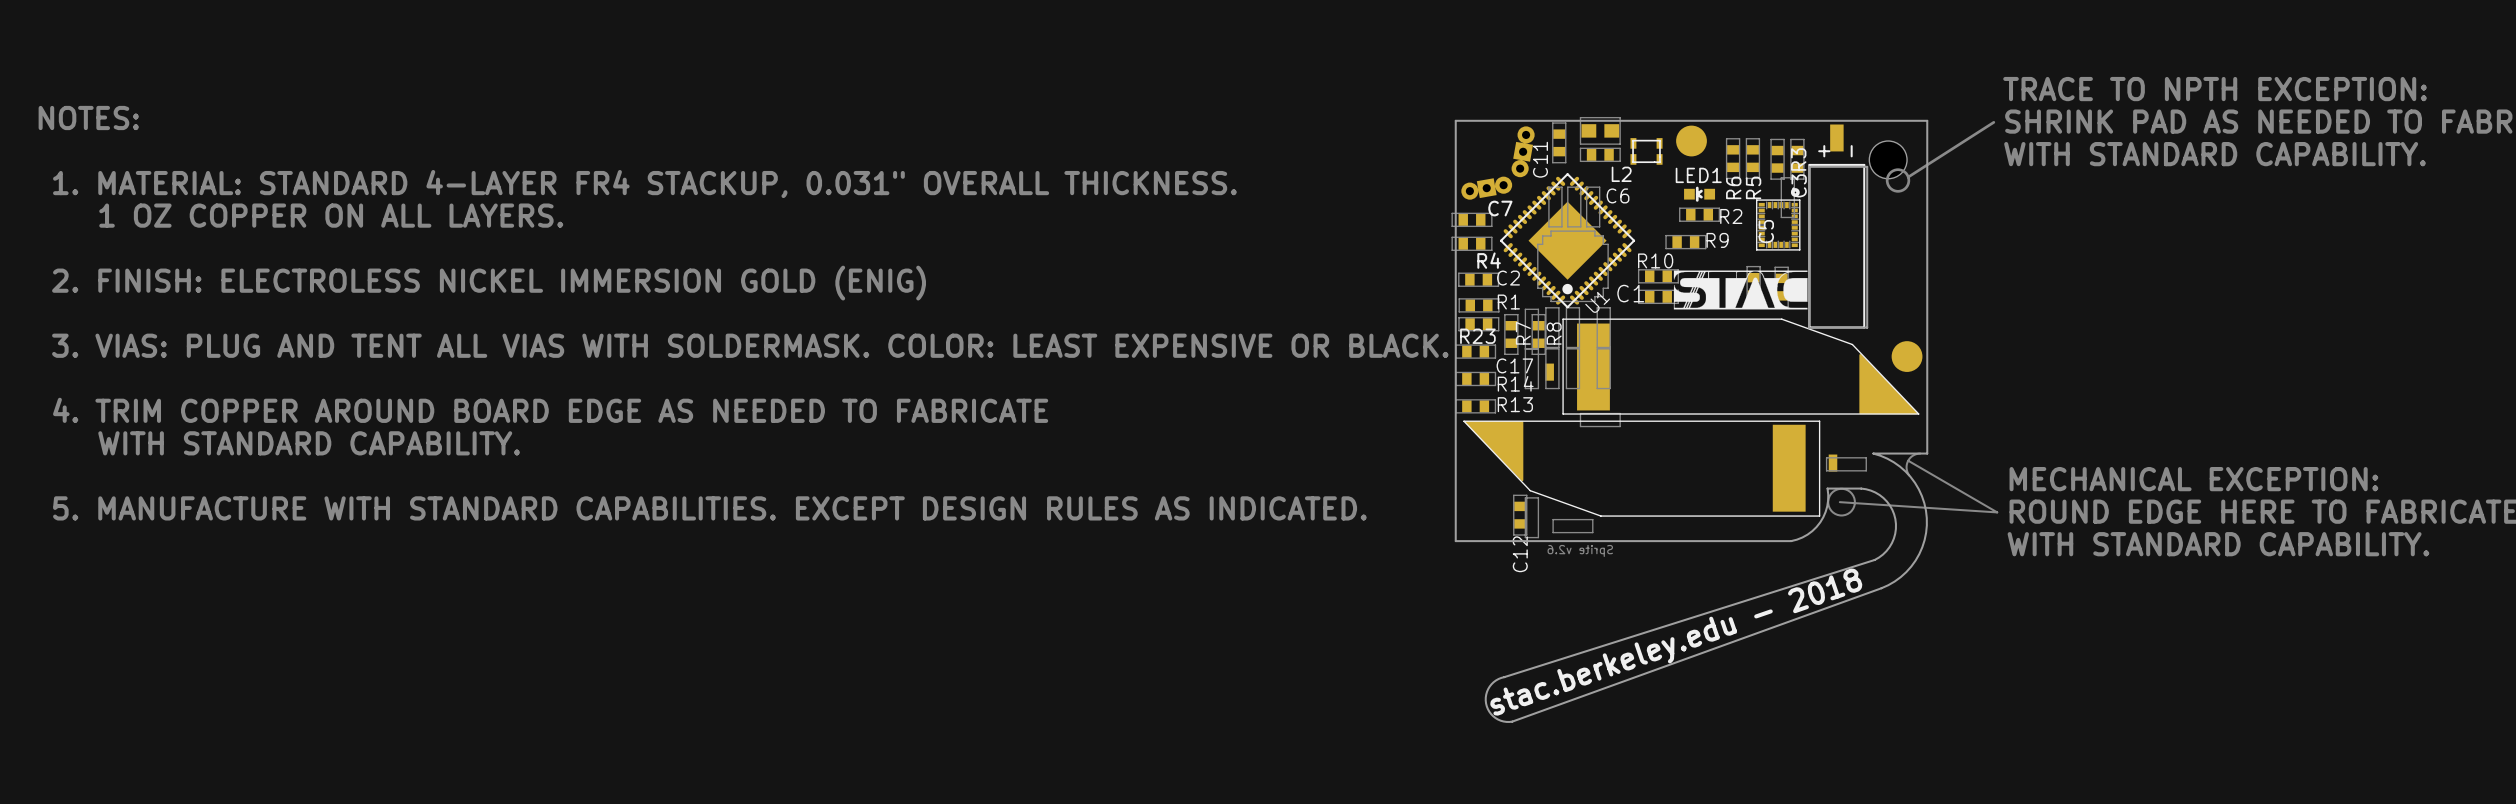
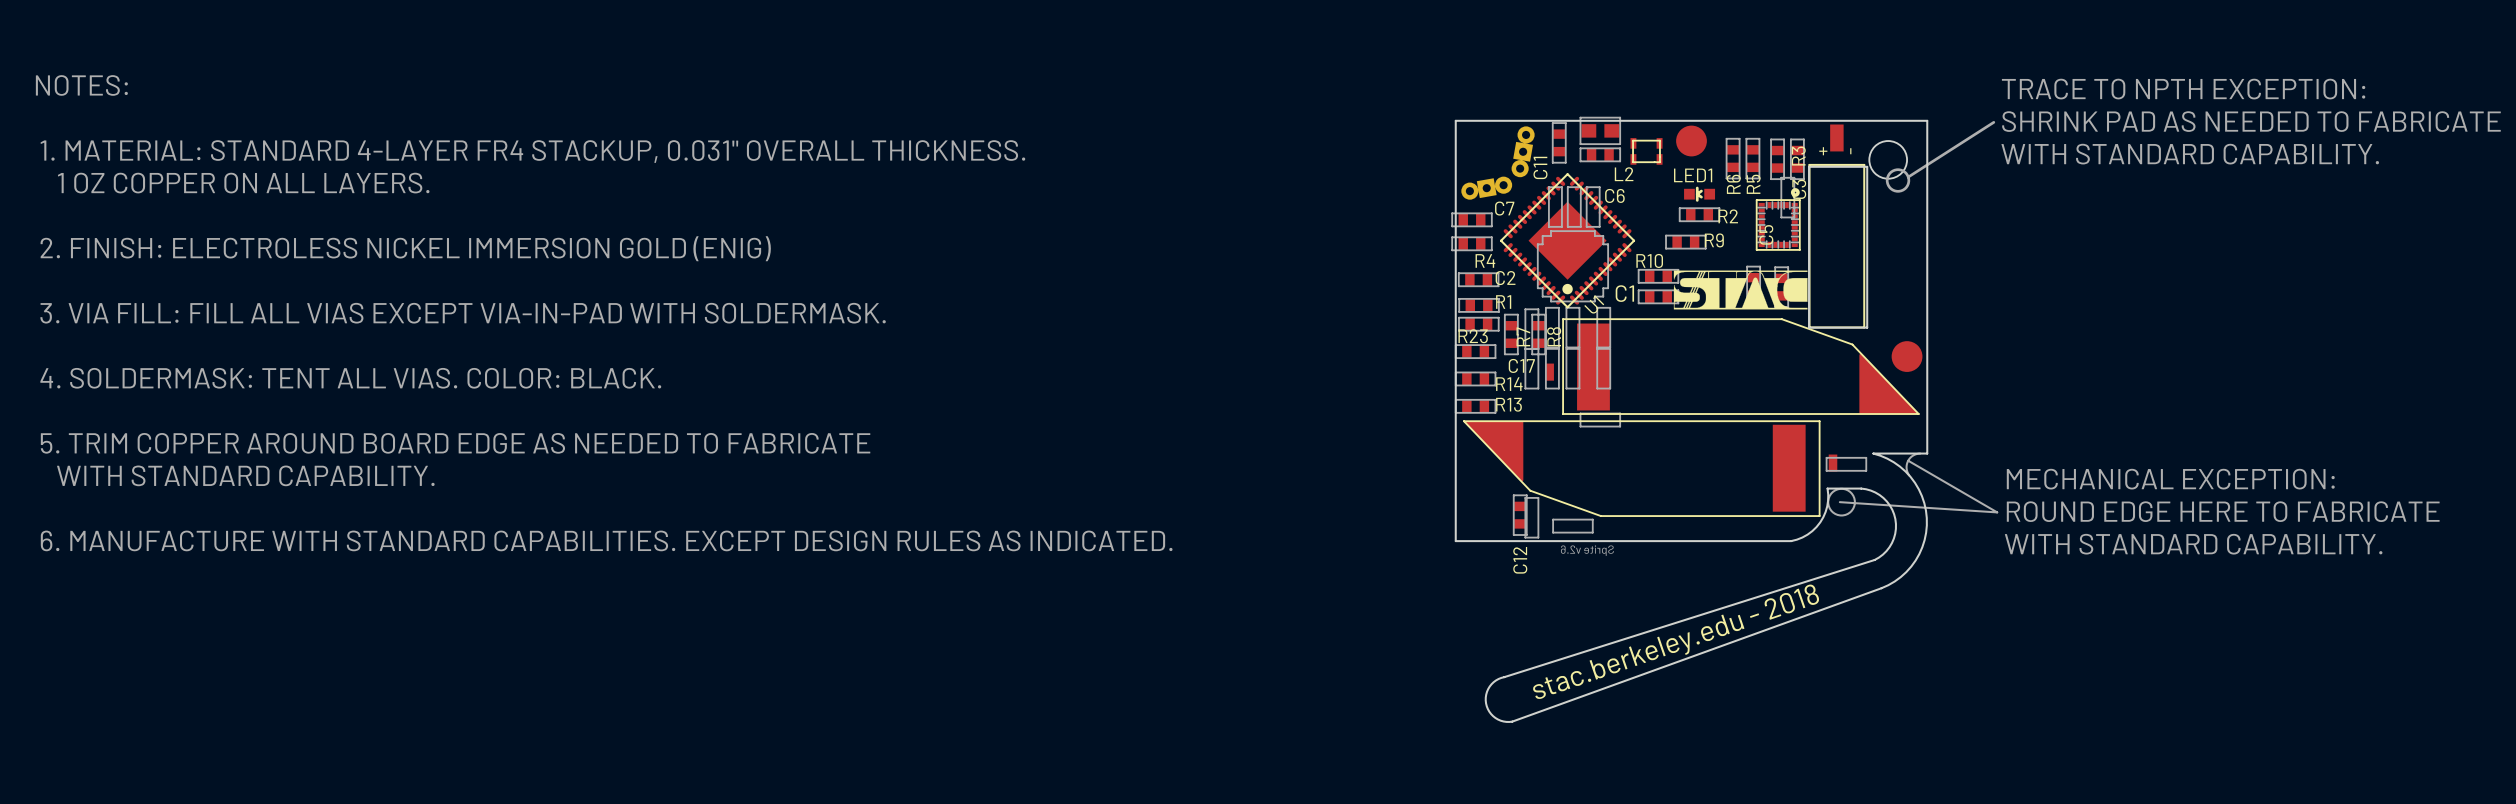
text position: NOTES: (88, 118) -> NOTES: (81, 85)
text: none -> 1. MATERIAL: STANDARD 4-LAYER FR4 STACKUP, 0.031" OVERALL THICKNESS. (532, 151)
text: 1. MATERIAL: STANDARD 4-LAYER FR4 STACKUP, 0.031" OVERALL THICKNESS. (644, 184) -> 1 OZ COPPER ON ALL LAYERS. (243, 183)
text: 1 OZ COPPER ON ALL LAYERS. (331, 215) -> none
text position: 2. FINISH: ELECTROLESS NICKEL IMMERSION GOLD (ENIG) (489, 283) -> 2. FINISH: ELECTROLESS NICKEL IMMERSION GOLD (ENIG) (405, 248)
text: none -> 3. VIA FILL: FILL ALL VIAS EXCEPT VIA-IN-PAD WITH SOLDERMASK. (463, 313)
text: 3. VIAS: PLUG AND TENT ALL VIAS WITH SOLDERMASK. COLOR: LEAST EXPENSIVE OR BLACK. (750, 345) -> none
text: none -> 4. SOLDERMASK: TENT ALL VIAS. COLOR: BLACK. (350, 378)
text: 4. TRIM COPPER AROUND BOARD EDGE AS NEEDED TO FABRICATE (550, 410) -> none
text: WITH STANDARD CAPABILITY. (309, 443) -> 5. TRIM COPPER AROUND BOARD EDGE AS NEEDED TO FABRICATE (455, 443)
text: none -> WITH STANDARD CAPABILITY. (245, 475)
text: 5. MANUFACTURE WITH STANDARD CAPABILITIES. EXCEPT DESIGN RULES AS INDICATED. (709, 508) -> 6. MANUFACTURE WITH STANDARD CAPABILITIES. EXCEPT DESIGN RULES AS INDICATED. (606, 540)

